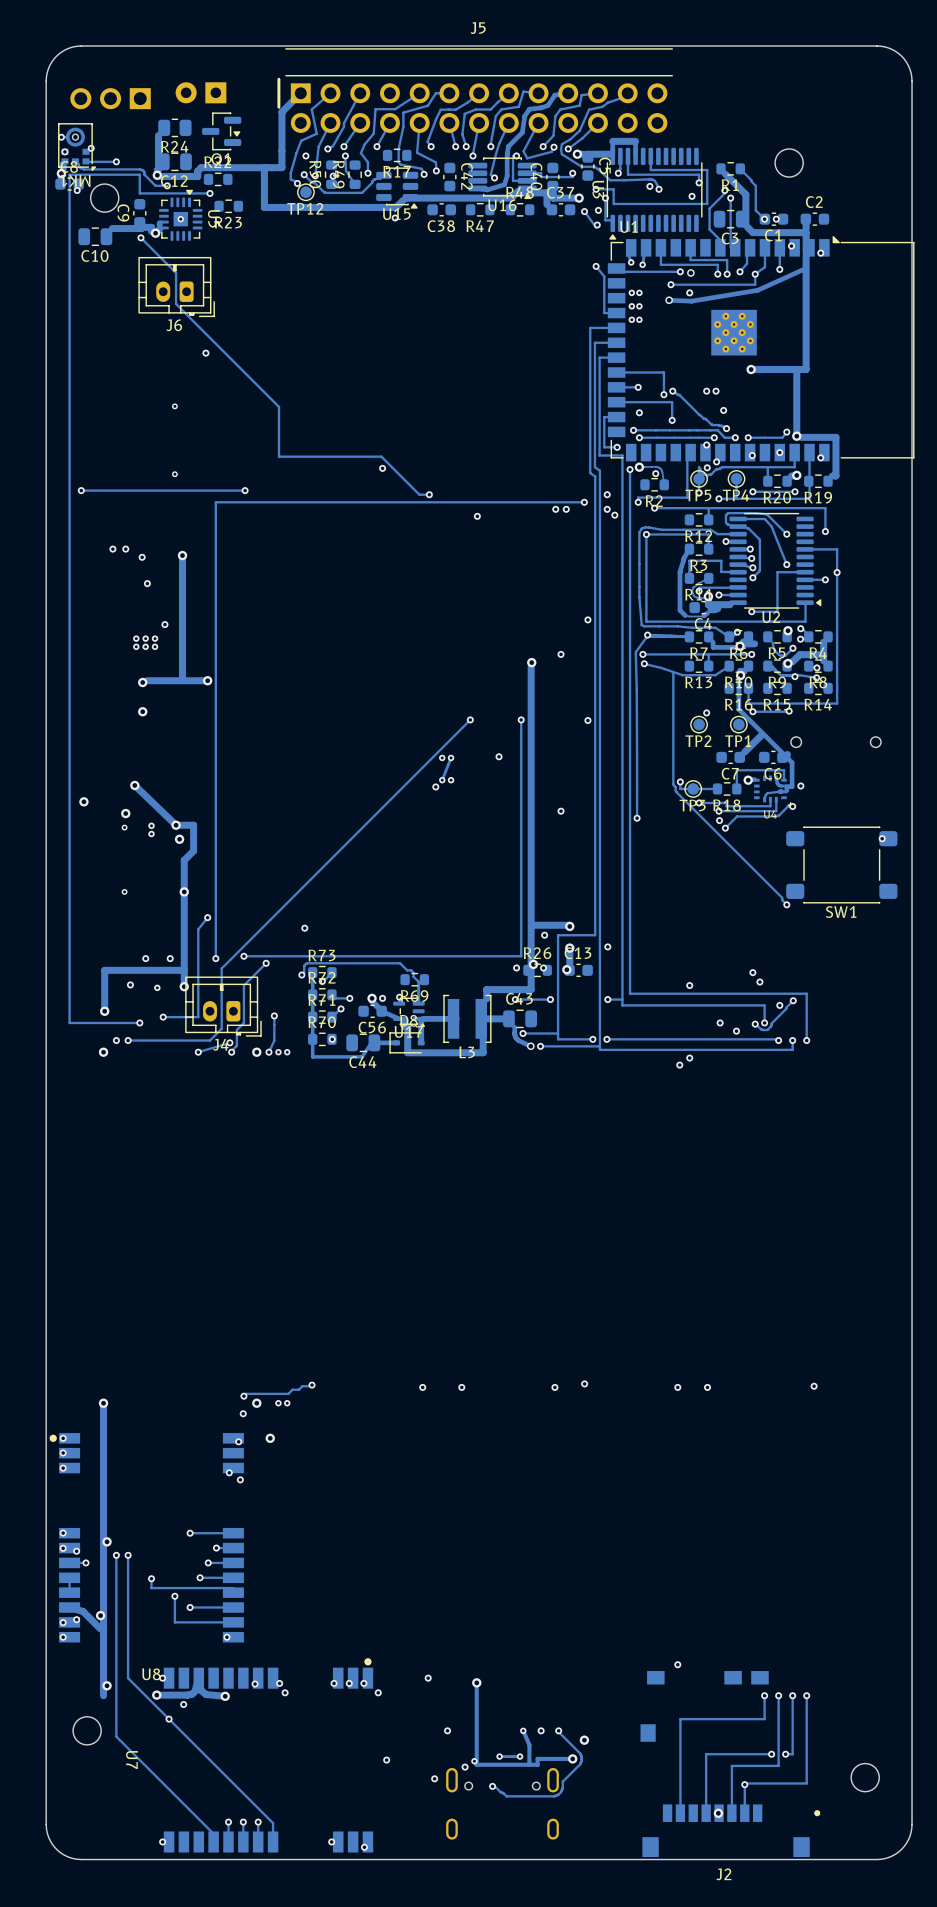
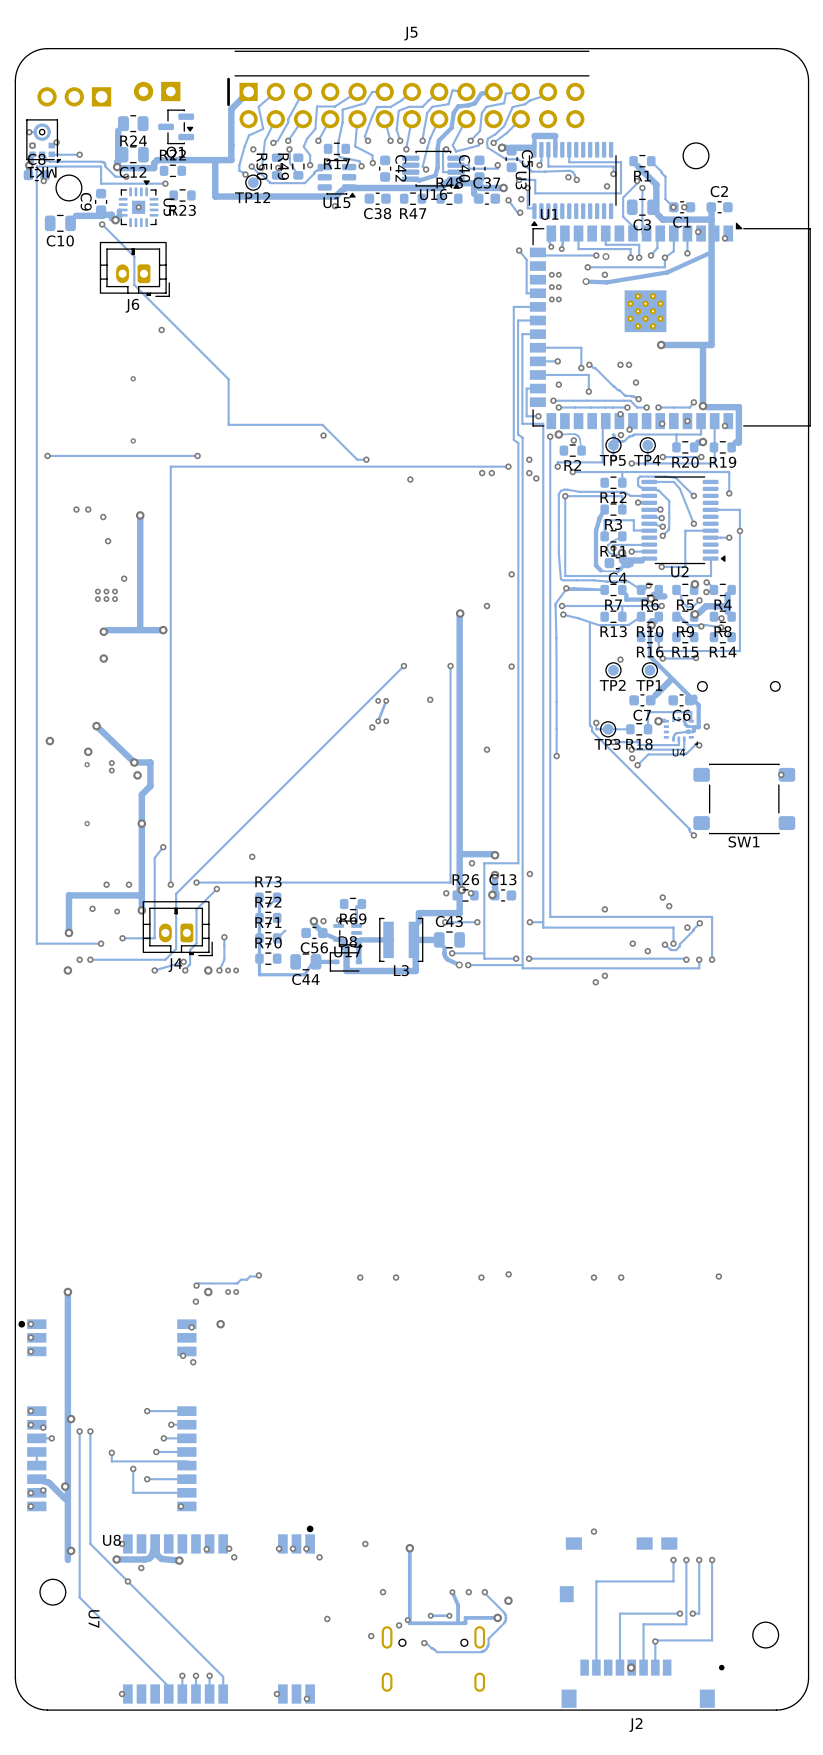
track: (301, 975) (307, 963) (400, 963) (407, 970) (411, 970) (413, 976) (418, 982) (424, 979) -> none
via: (301, 975) -> none
via: (322, 981) -> none
track: (332, 994) (335, 998) (349, 998) -> none
via: (349, 998) -> none
via: (341, 1008) -> none
via: (332, 1039) -> none

